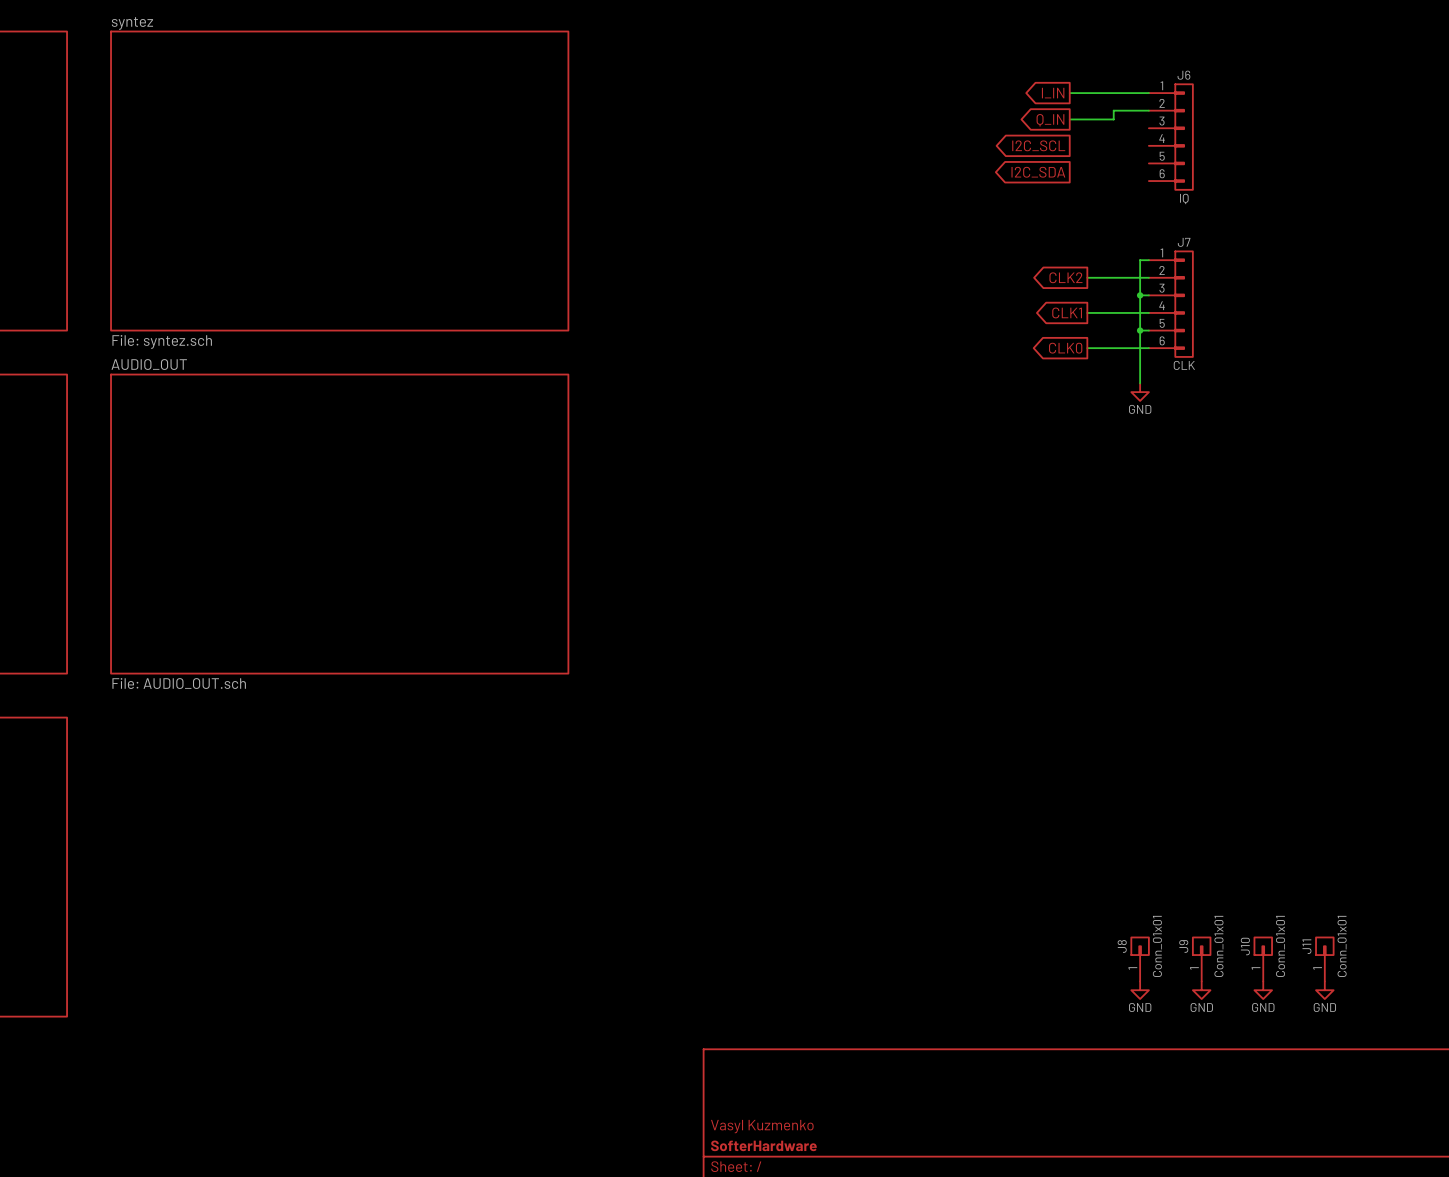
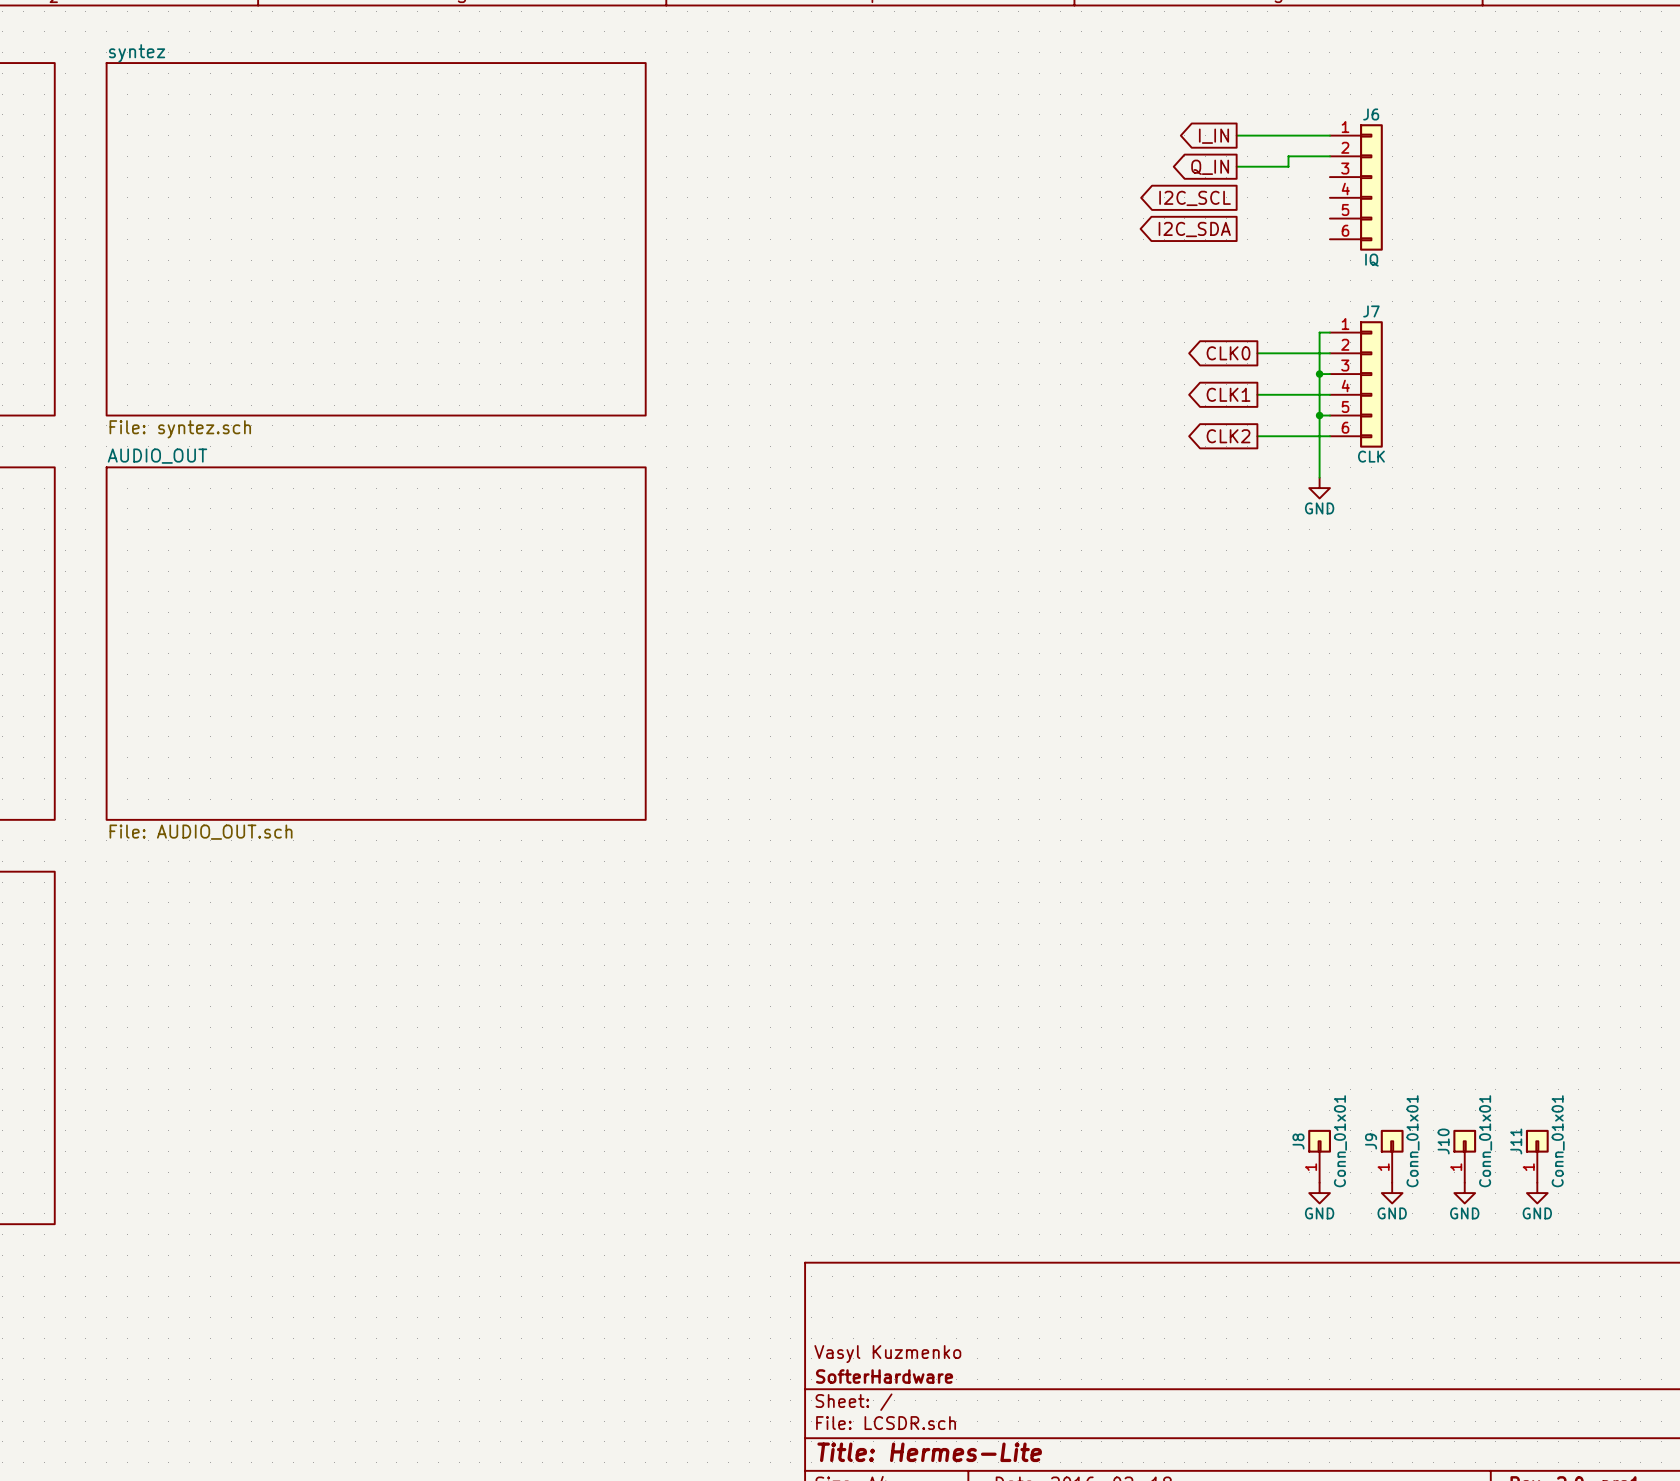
global label: CLK2 (1065, 277) -> CLK0 (1228, 353)
global label: CLK0 (1065, 348) -> CLK2 (1228, 436)

